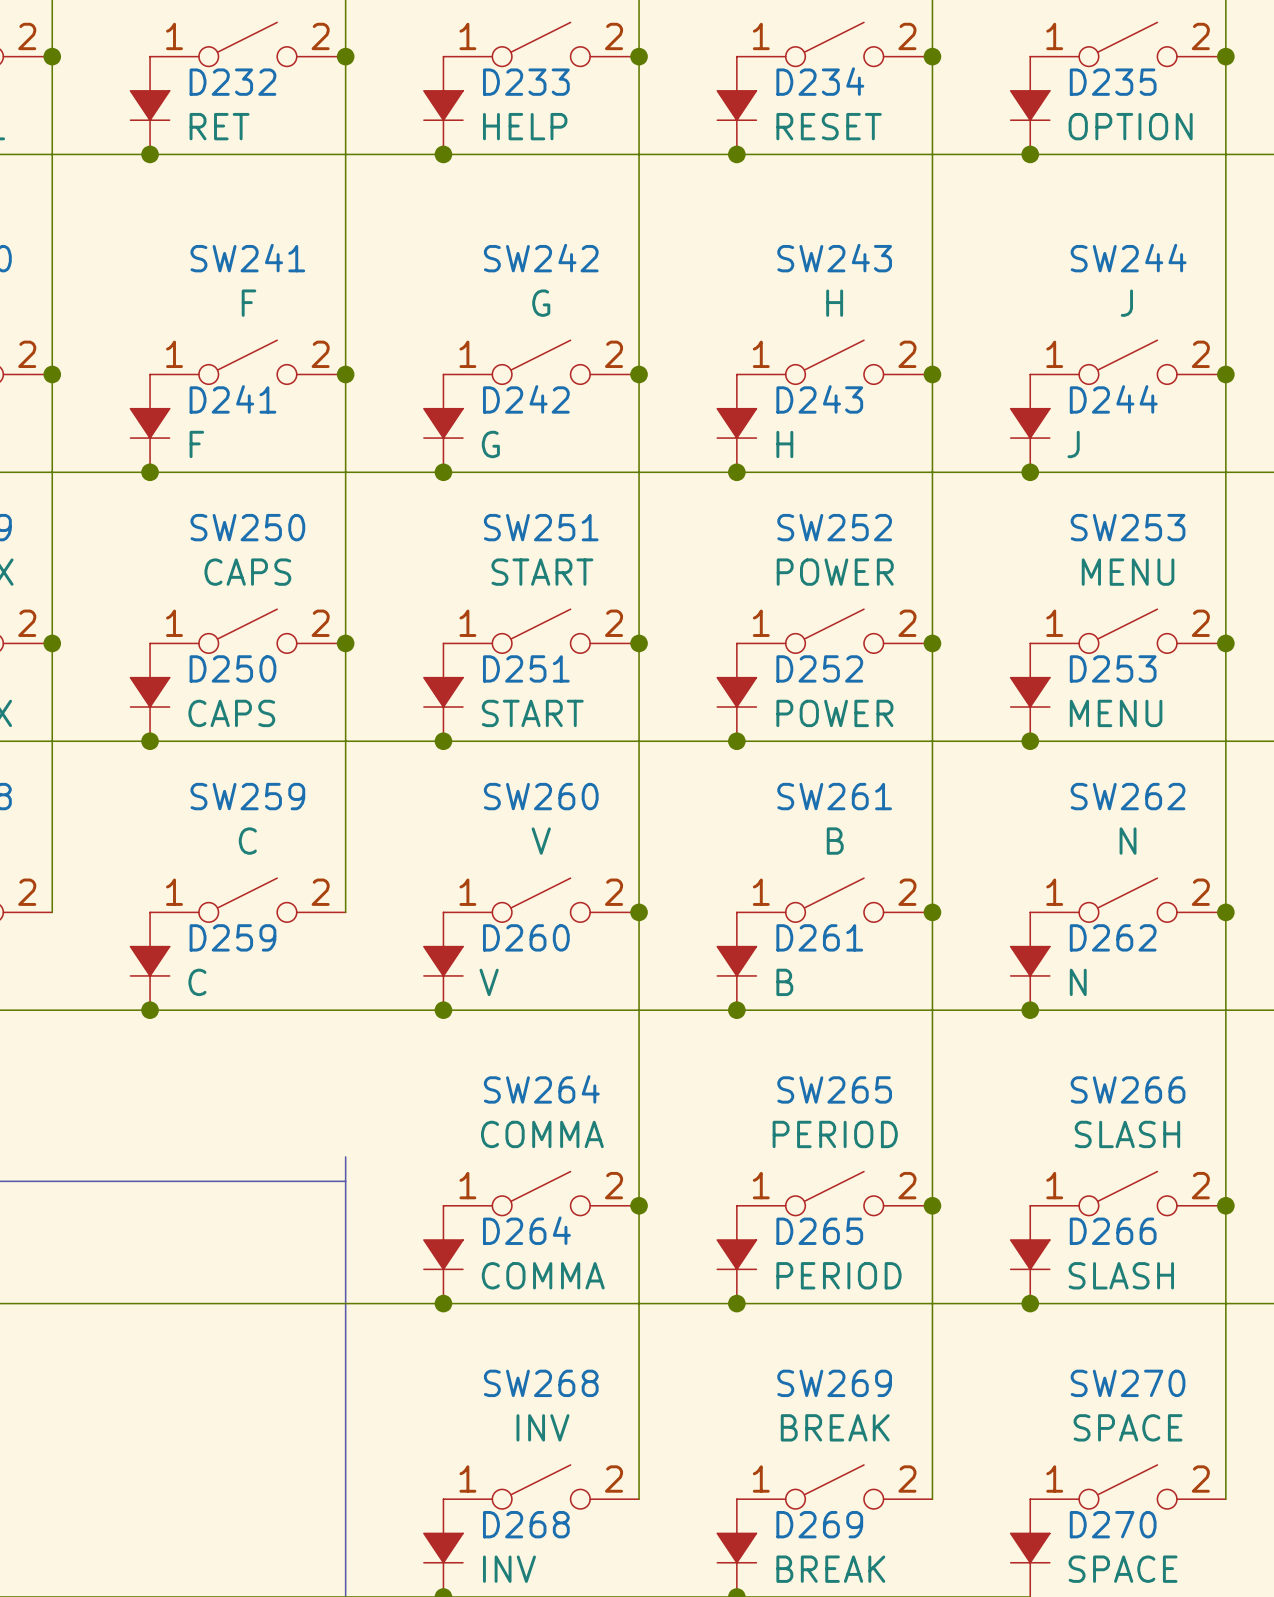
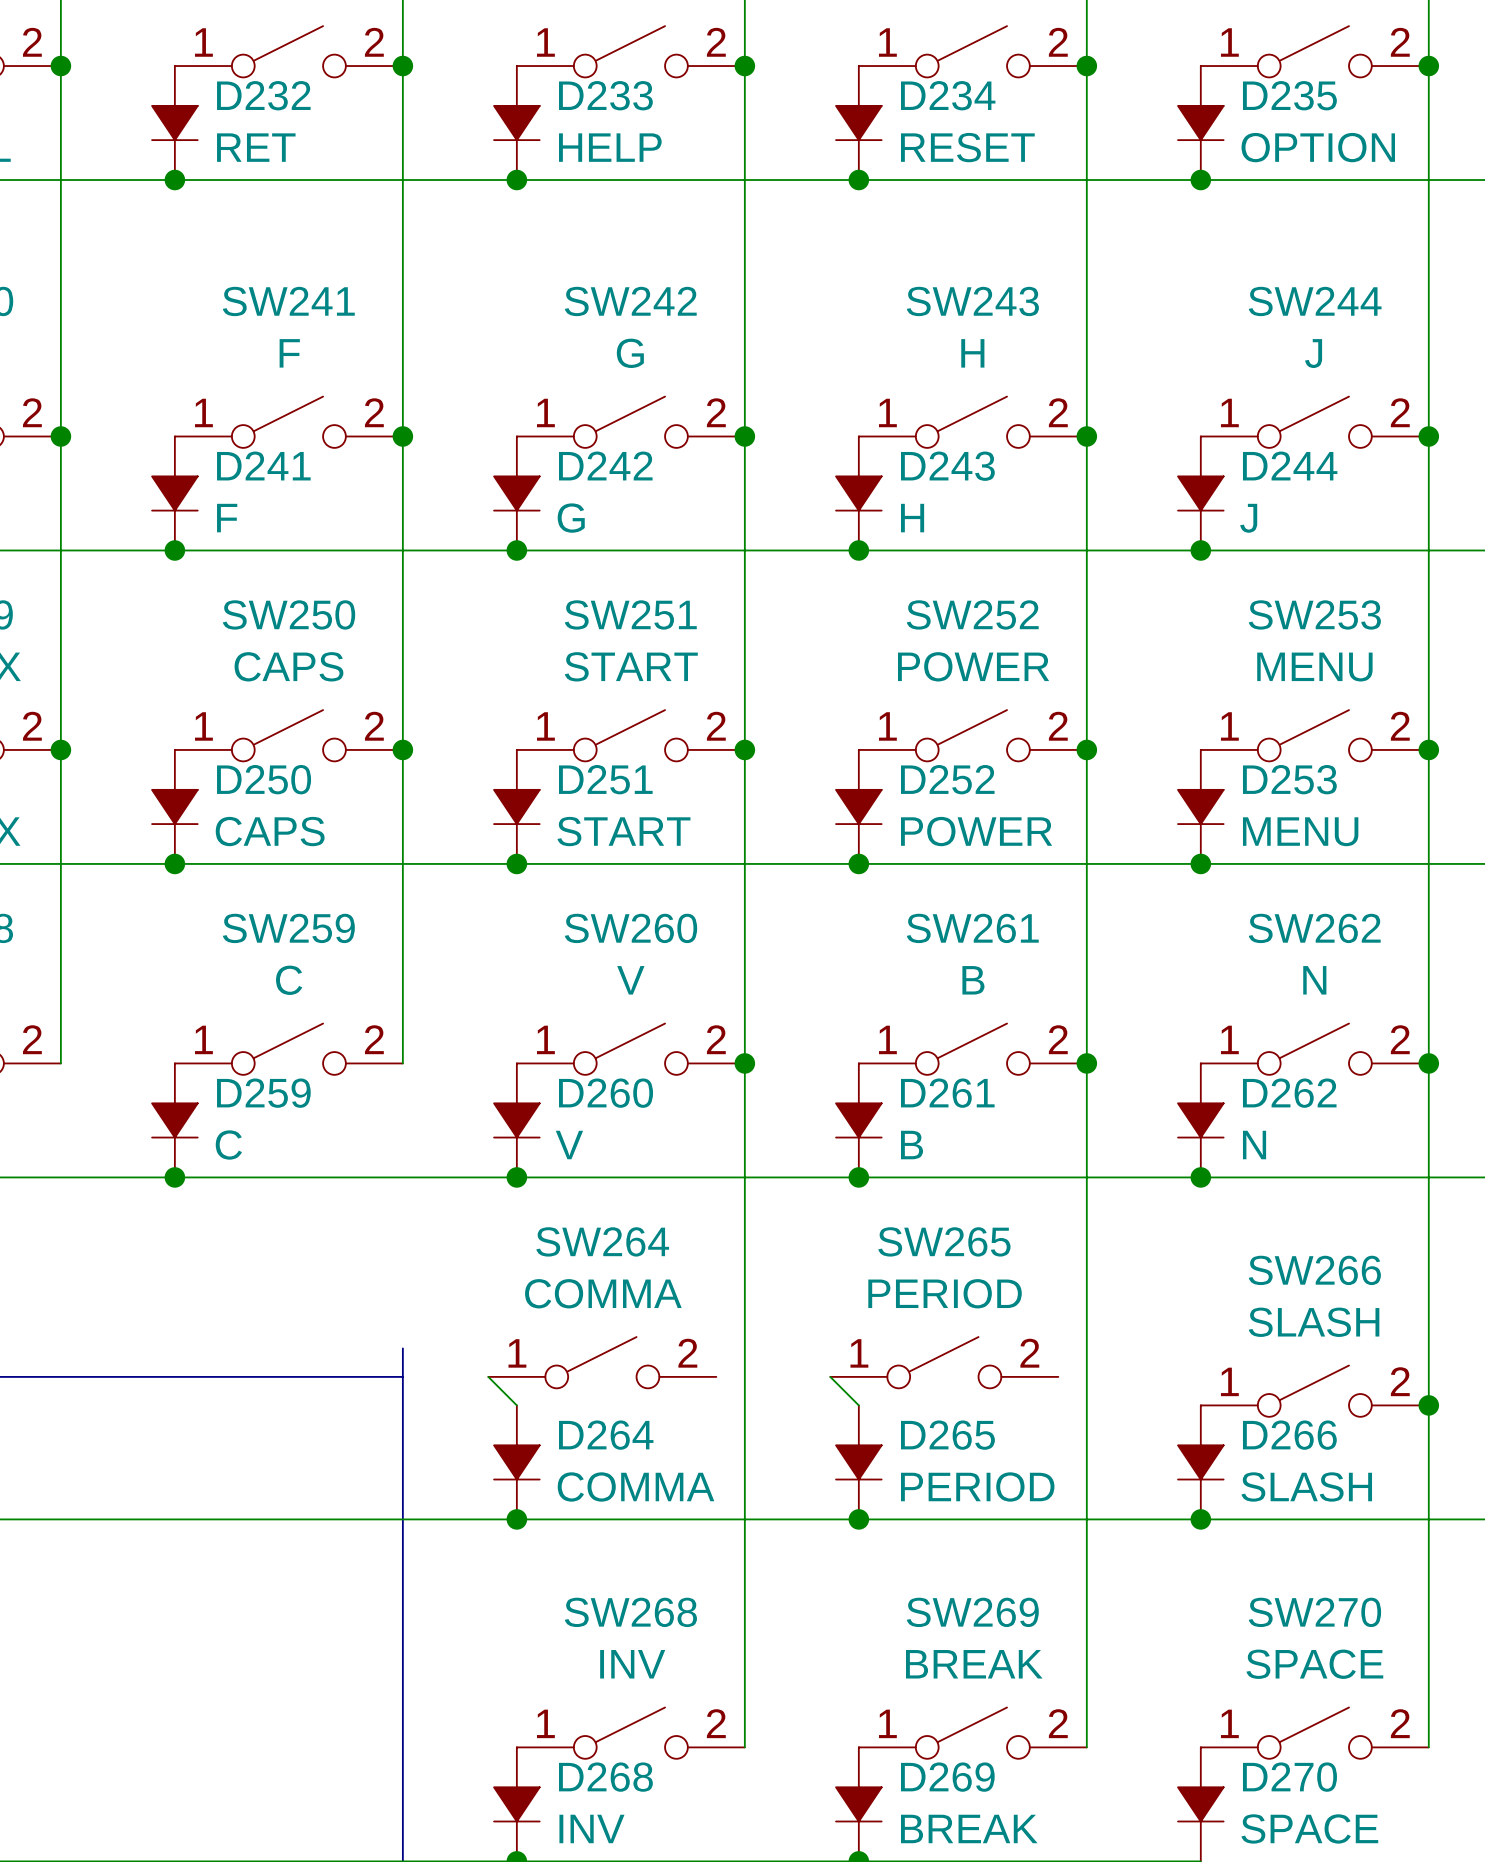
wire: none -> (488, 1376) (516, 1405)
wire: none -> (830, 1376) (858, 1405)
SW264 position: (541, 1193) -> (602, 1362)
SW265 position: (834, 1193) -> (944, 1362)
junction: (639, 1205) -> none
junction: (932, 1205) -> none

